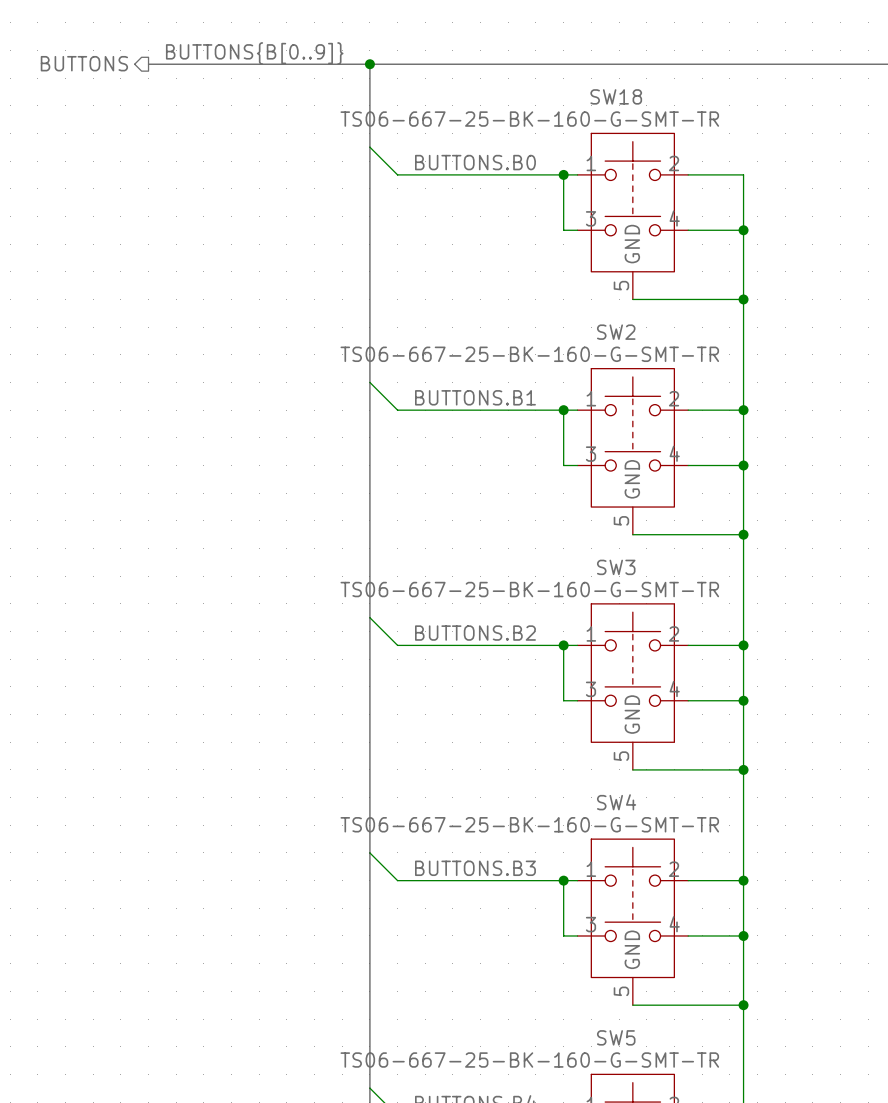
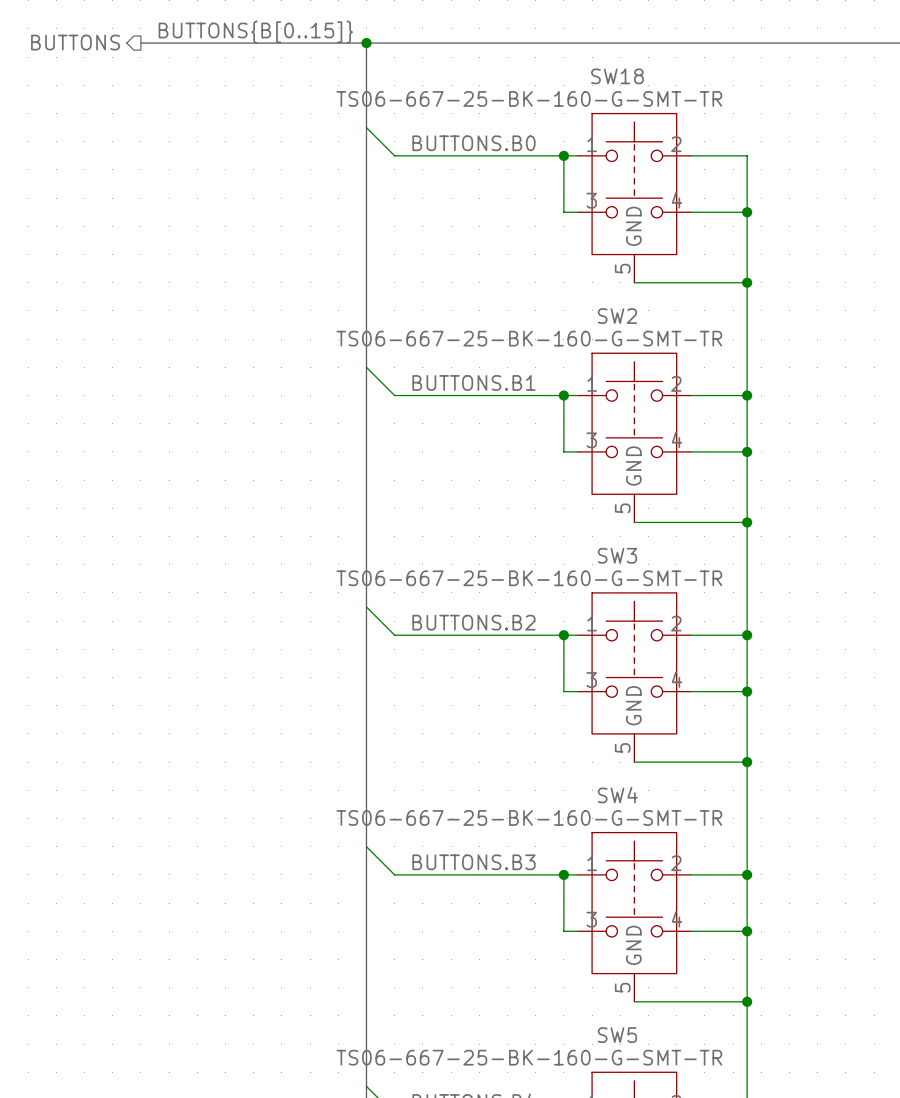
label: BUTTONS{B[0..9]} (254, 53) -> BUTTONS{B[0..15]} (255, 32)

